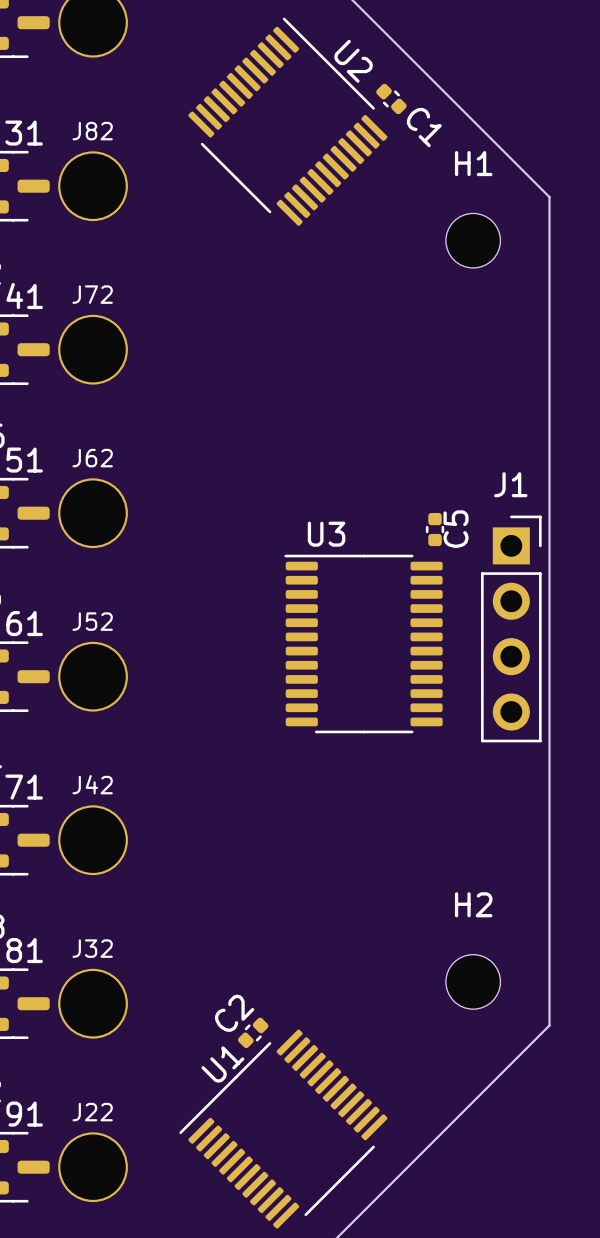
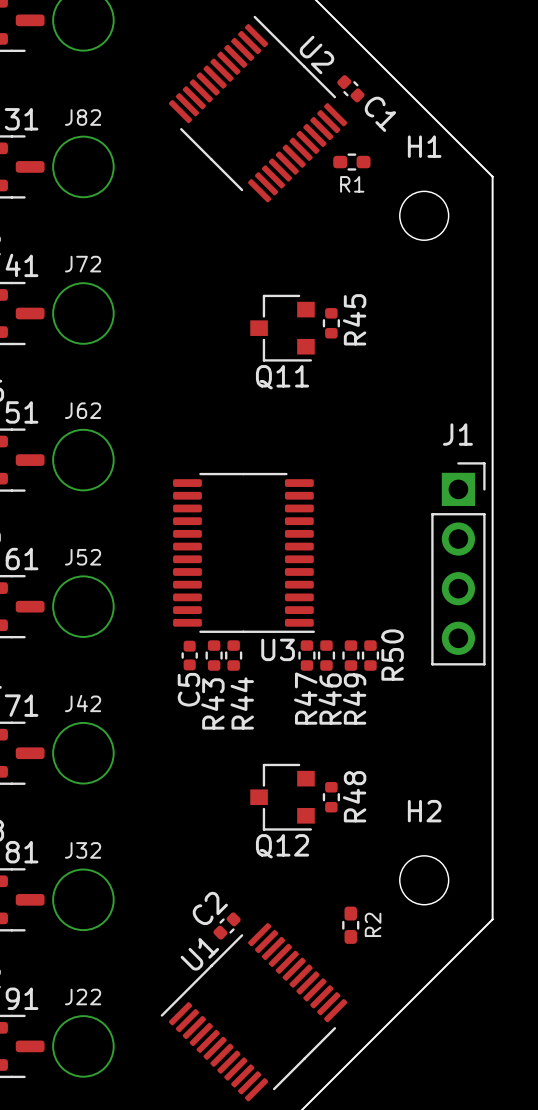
R1: none -> (351, 162)
R45: none -> (331, 323)
Q11: none -> (282, 328)
C5 position: (435, 529) -> (189, 655)
C5 name position: C5 (456, 529) -> C5 (188, 689)
U3 rotation: 0° (363, 644) -> 180° (244, 552)
R43: none -> (214, 655)
R44: none -> (233, 655)
R47: none -> (306, 655)
R46: none -> (326, 655)
R49: none -> (350, 655)
R50: none -> (370, 655)
Q12: none -> (282, 797)
R48: none -> (331, 797)
R2: none -> (350, 925)

